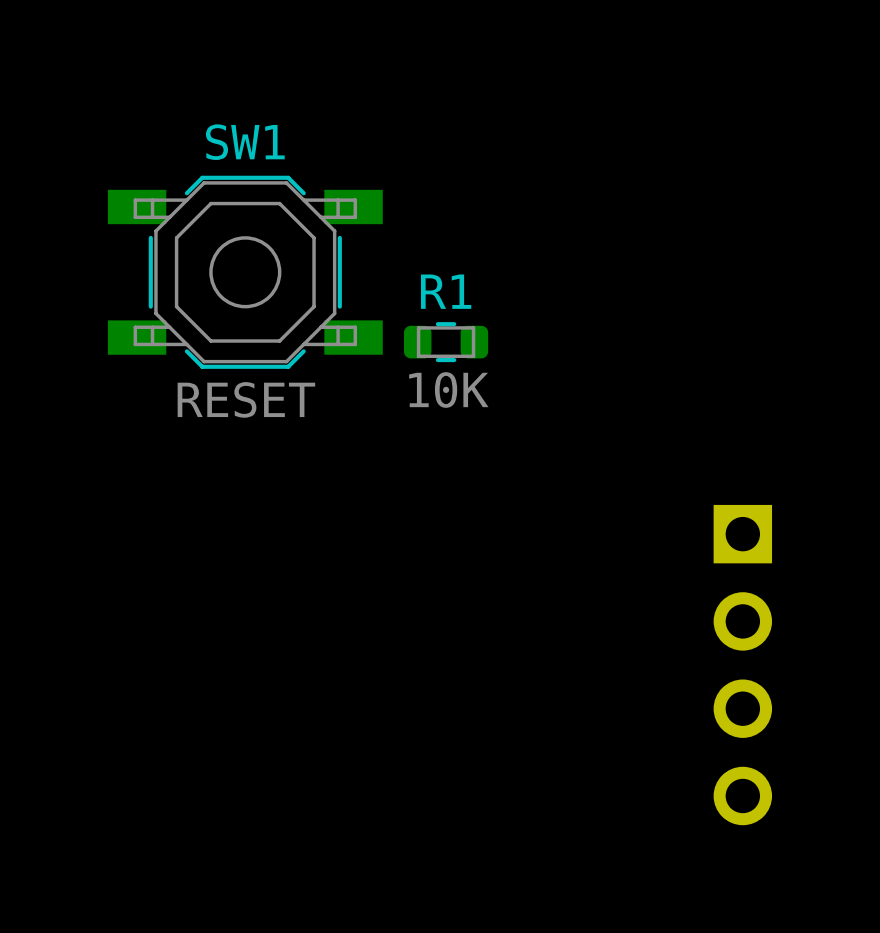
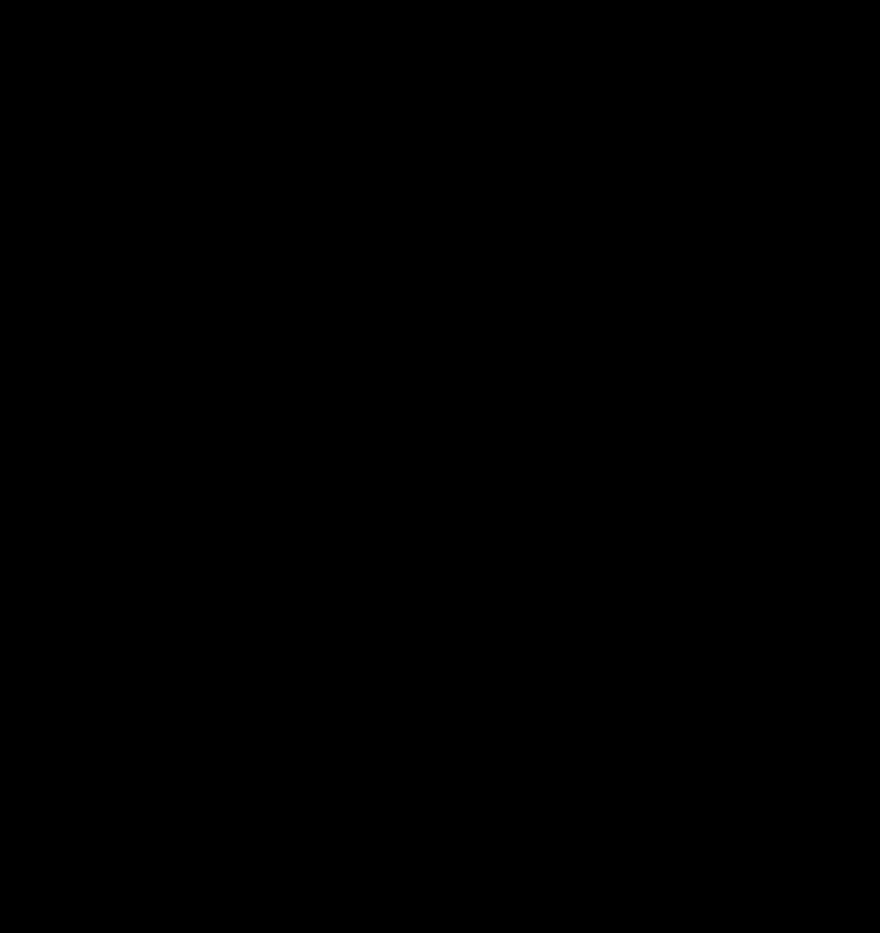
SW1: RESET (245, 272) -> none
R1: 10K (446, 342) -> none
part: (742, 665) -> none

